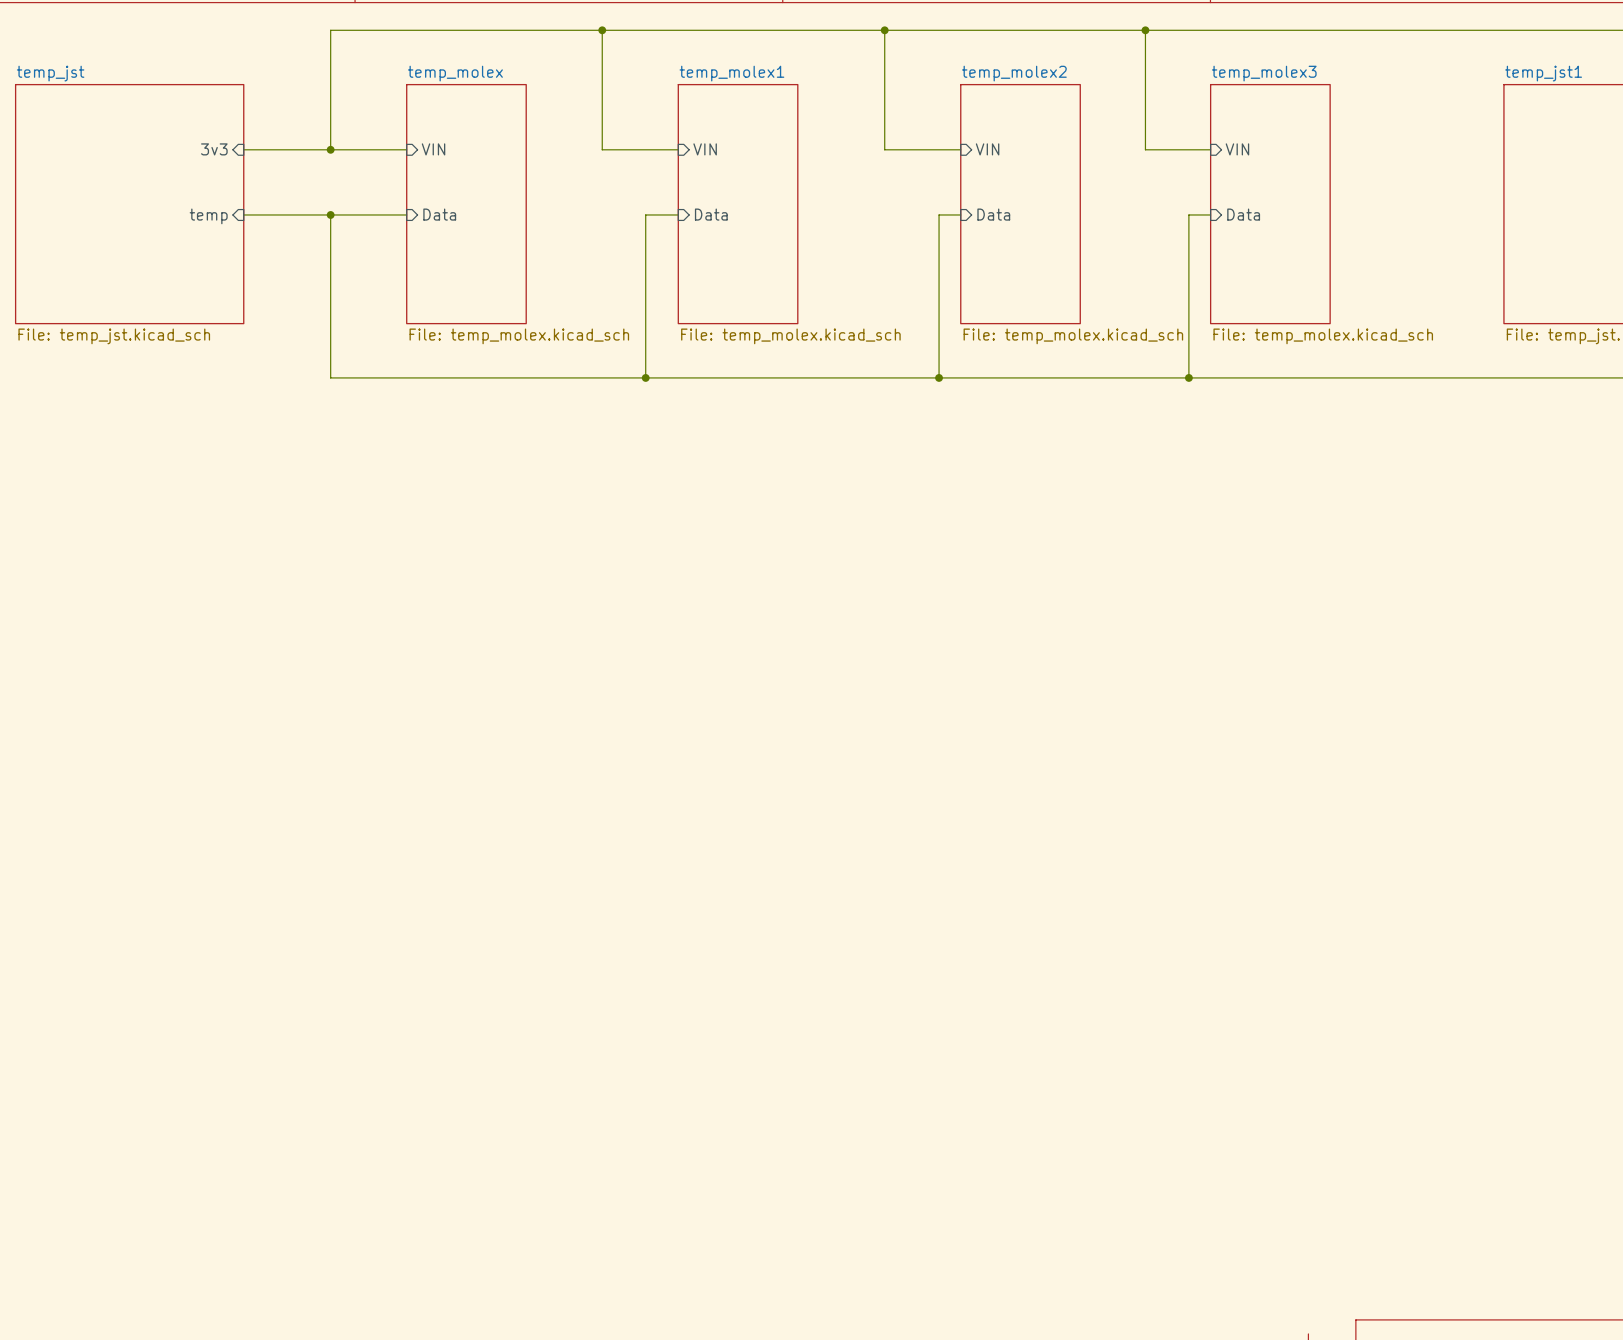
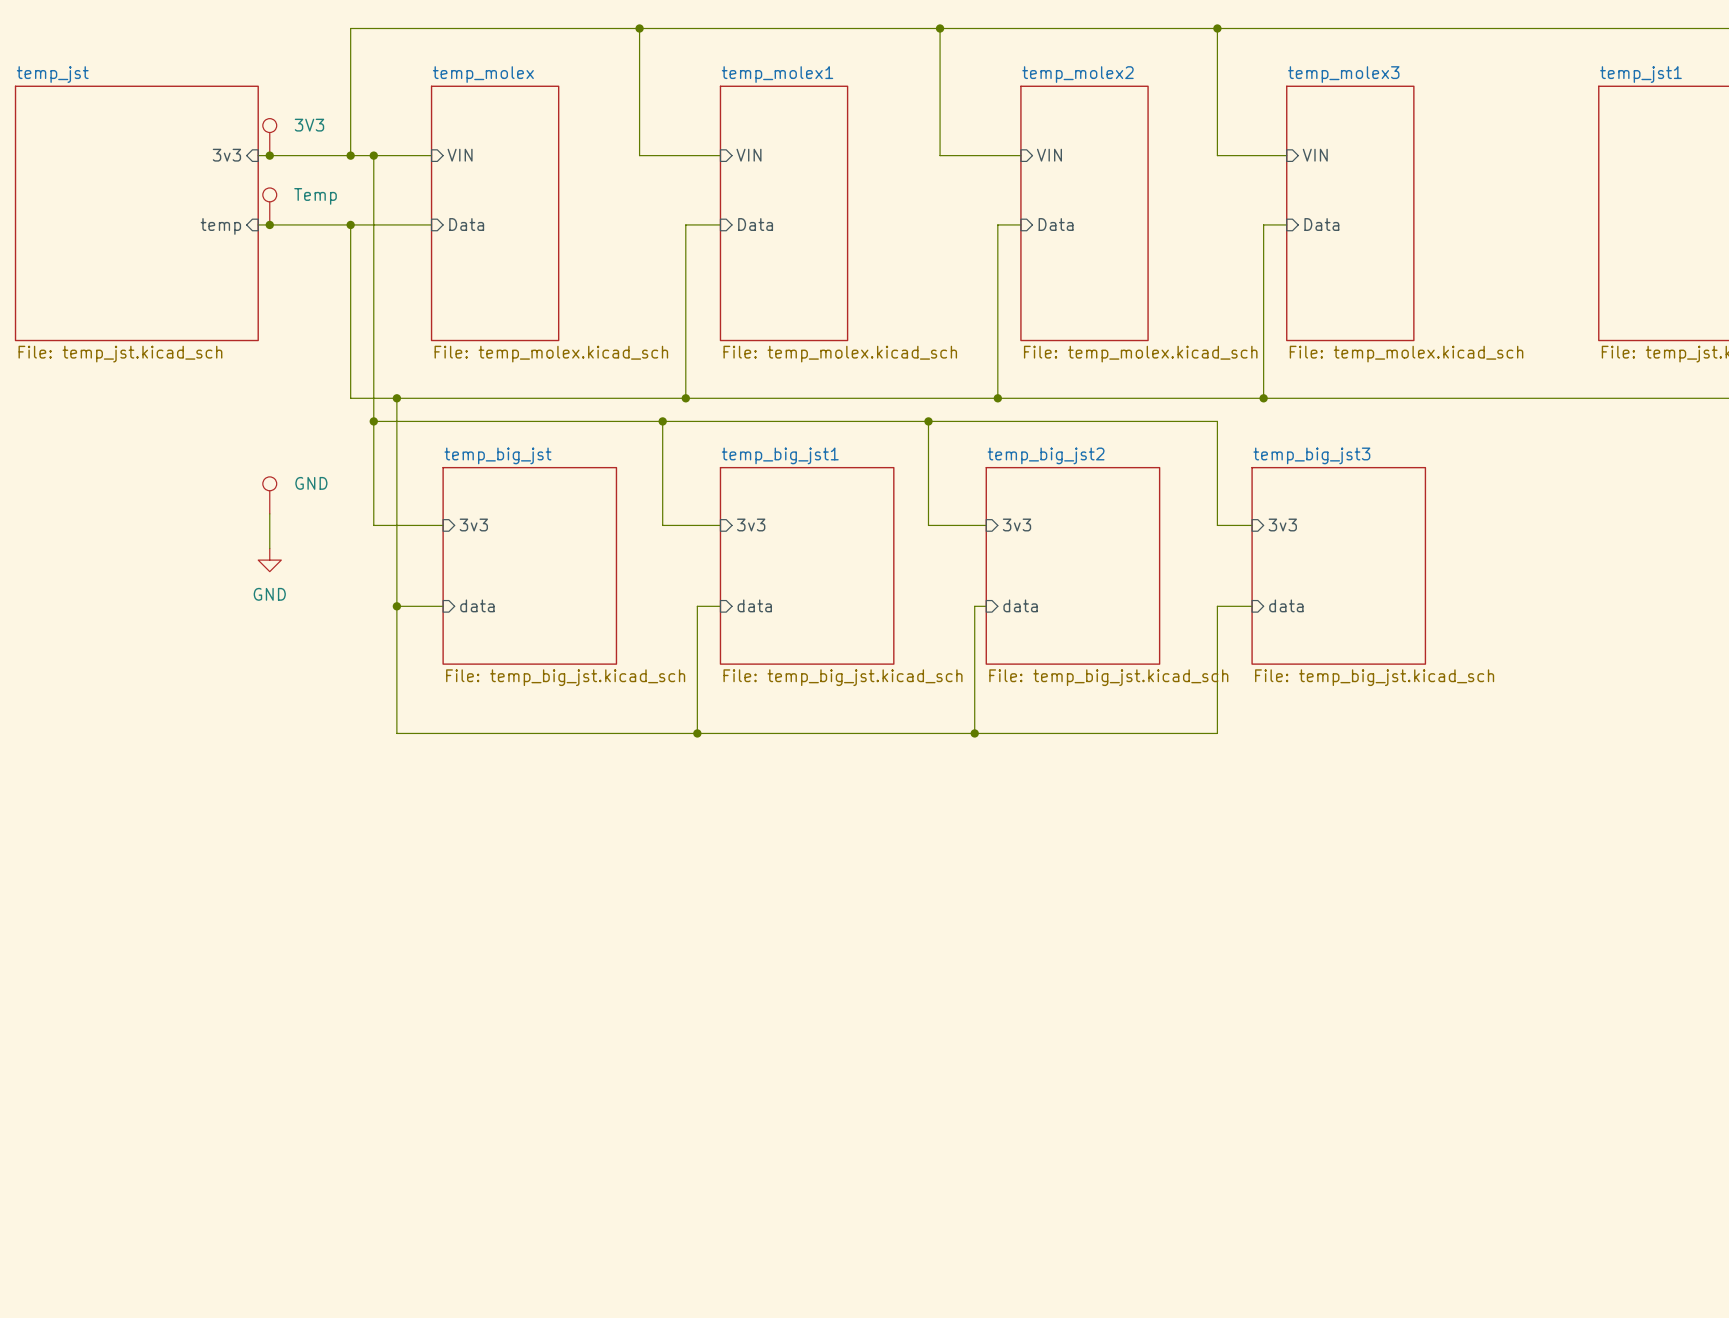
part: none -> (269, 137)
junction: none -> (269, 155)
wire: none -> (373, 155) (373, 525) (443, 525)
junction: none -> (373, 155)
part: none -> (269, 206)
junction: none -> (269, 224)
wire: none -> (396, 398) (396, 733) (1217, 733) (1217, 606) (1252, 606)
junction: none -> (396, 398)
wire: none -> (373, 421) (1217, 421) (1217, 525) (1252, 525)
junction: none -> (373, 421)
wire: none -> (662, 421) (662, 525) (720, 525)
junction: none -> (662, 421)
wire: none -> (928, 421) (928, 525) (986, 525)
junction: none -> (928, 421)
part: none -> (269, 495)
wire: none -> (269, 513) (269, 548)
sheet pin: none -> 3v3 (473, 524)
sheet pin: none -> 3v3 (751, 524)
sheet pin: none -> 3v3 (1016, 524)
sheet pin: none -> 3v3 (1282, 524)
power symbol: none -> GND (269, 560)
sheet temp_big_jst: none -> File: temp_big_jst.kicad_sch (529, 565)
sheet temp_big_jst1: none -> File: temp_big_jst.kicad_sch (807, 565)
sheet temp_big_jst2: none -> File: temp_big_jst.kicad_sch (1072, 565)
sheet temp_big_jst3: none -> File: temp_big_jst.kicad_sch (1338, 565)
wire: none -> (396, 606) (443, 606)
junction: none -> (396, 606)
sheet pin: none -> data (477, 605)
wire: none -> (720, 606) (697, 606) (697, 733)
sheet pin: none -> data (754, 605)
wire: none -> (986, 606) (974, 606) (974, 733)
sheet pin: none -> data (1020, 605)
sheet pin: none -> data (1286, 605)
junction: none -> (697, 733)
junction: none -> (974, 733)

